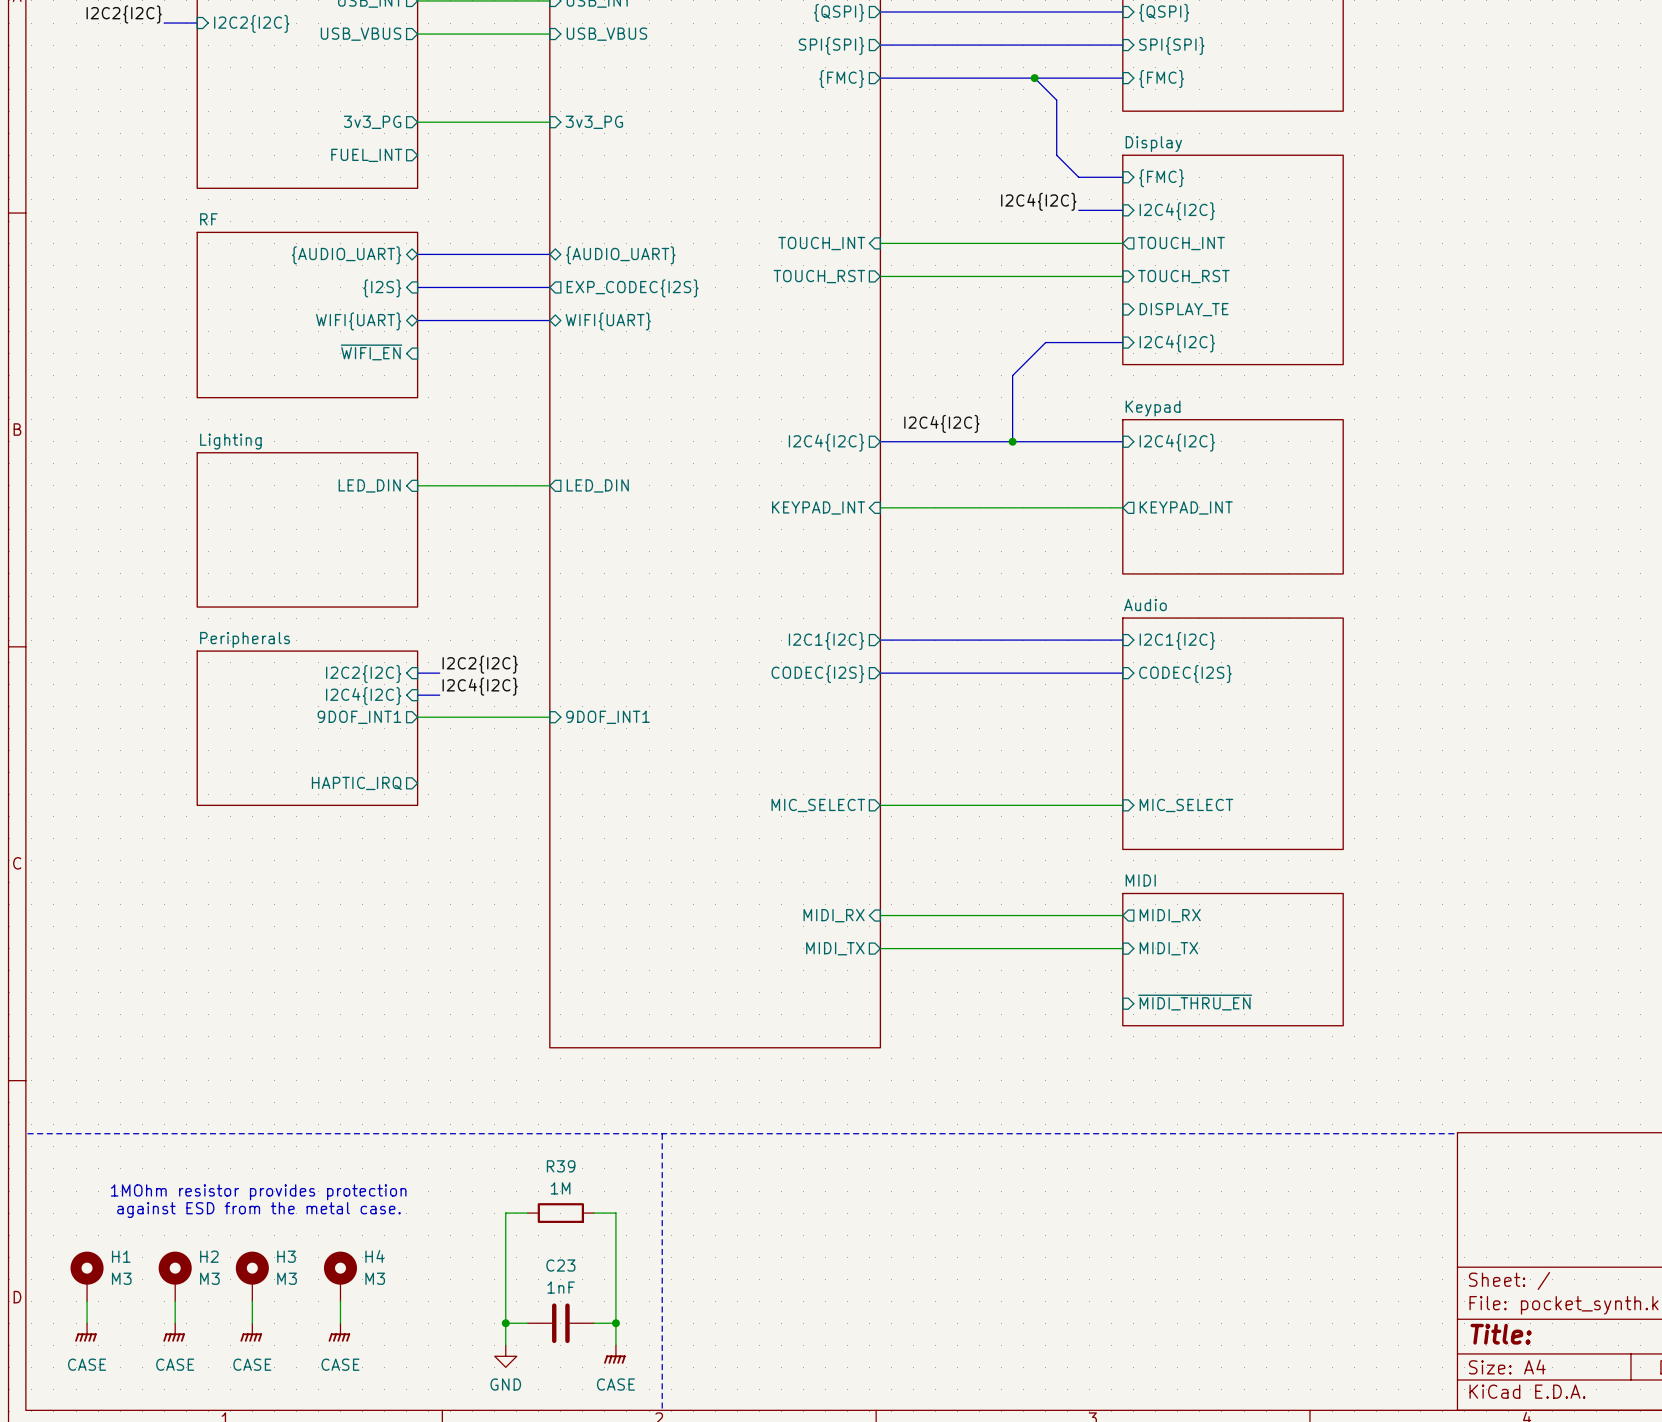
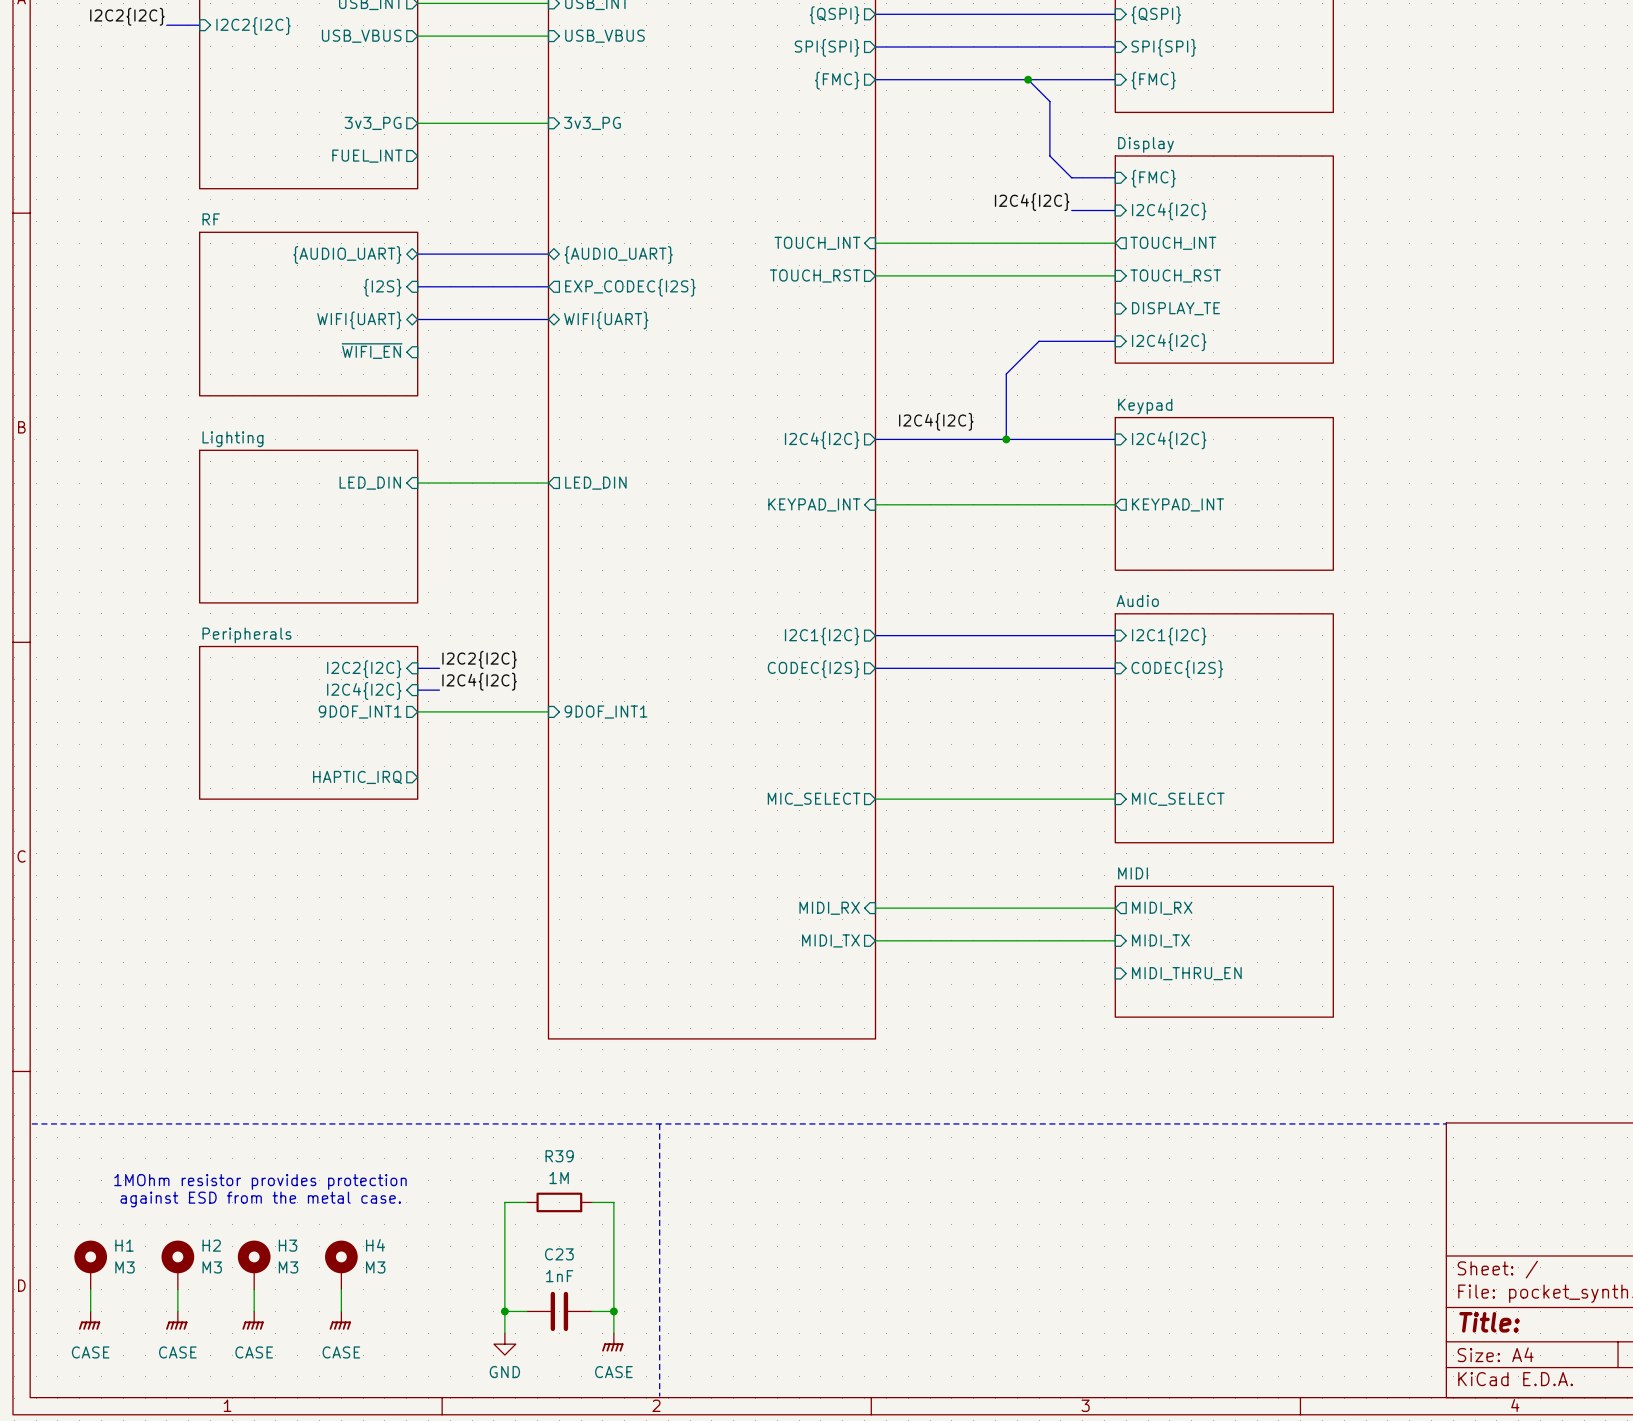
sheet pin: ~{MIDI_THRU_EN} (1195, 1002) -> MIDI_THRU_EN (1186, 973)

